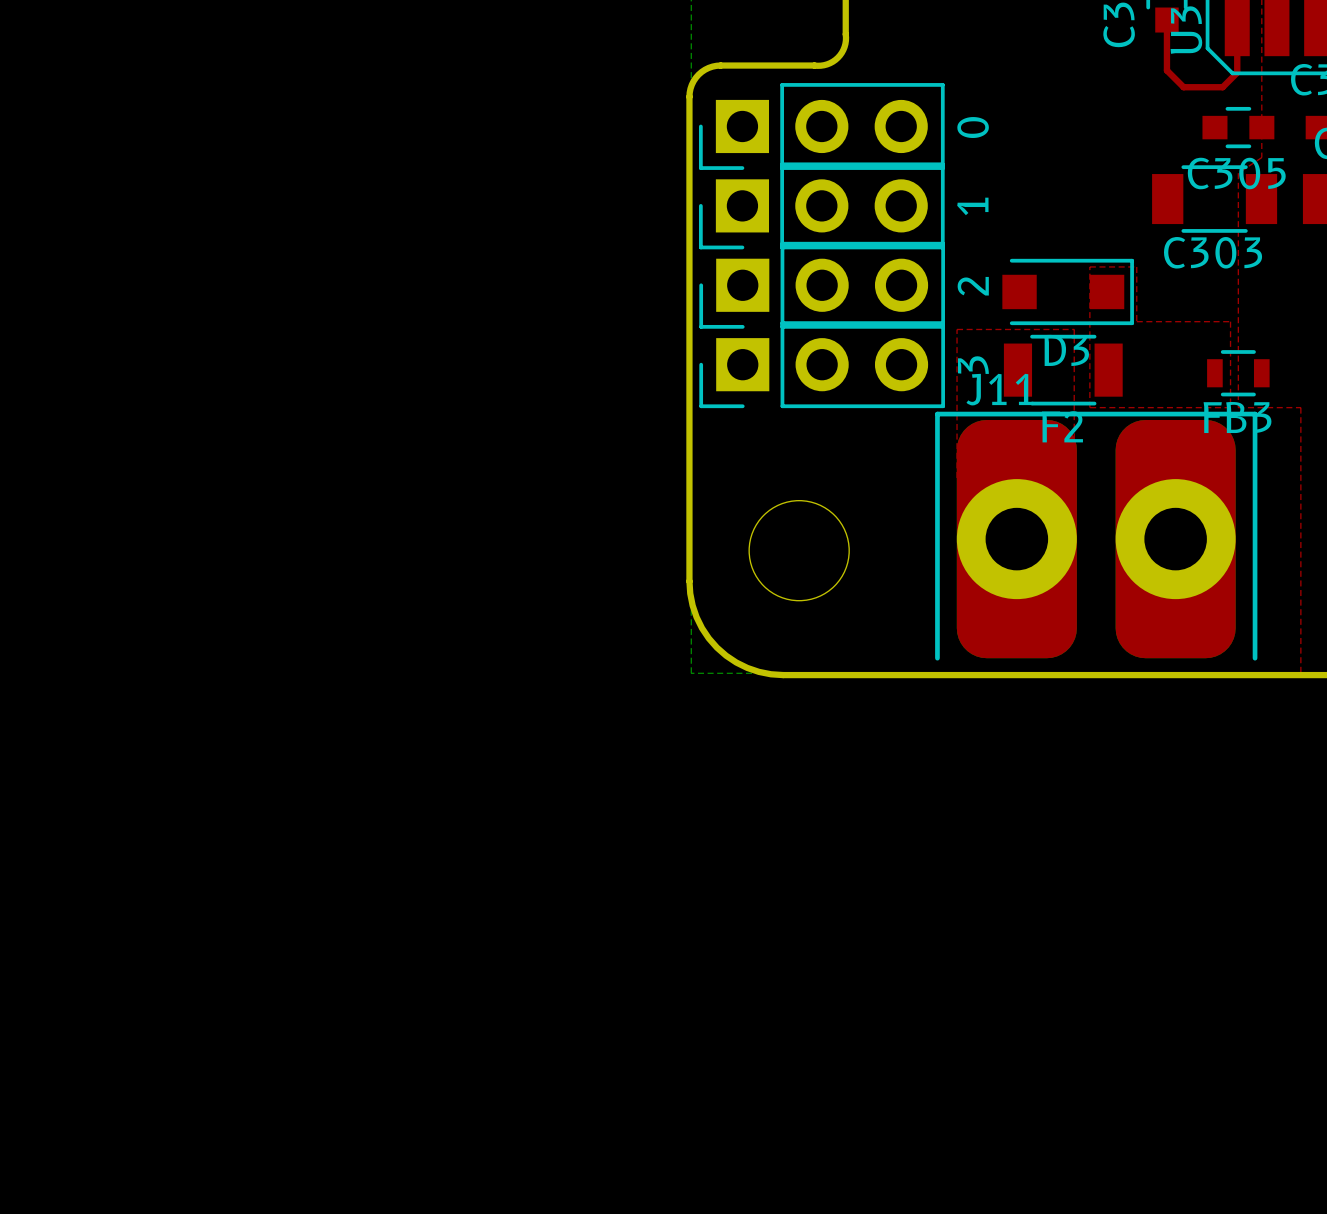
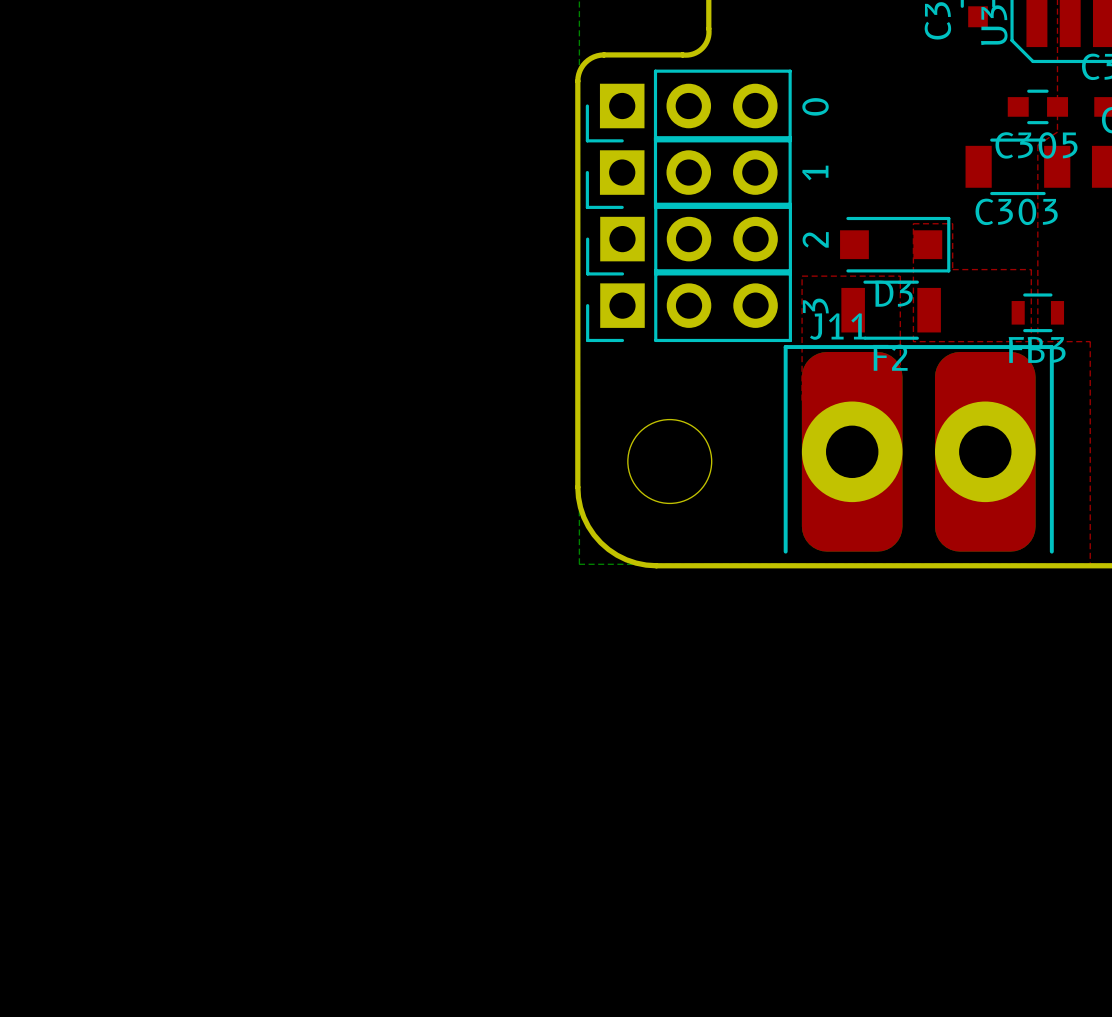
top track: (1166, 20) (1166, 70) (1183, 87) (1222, 87) (1237, 72) (1237, 21) -> none

